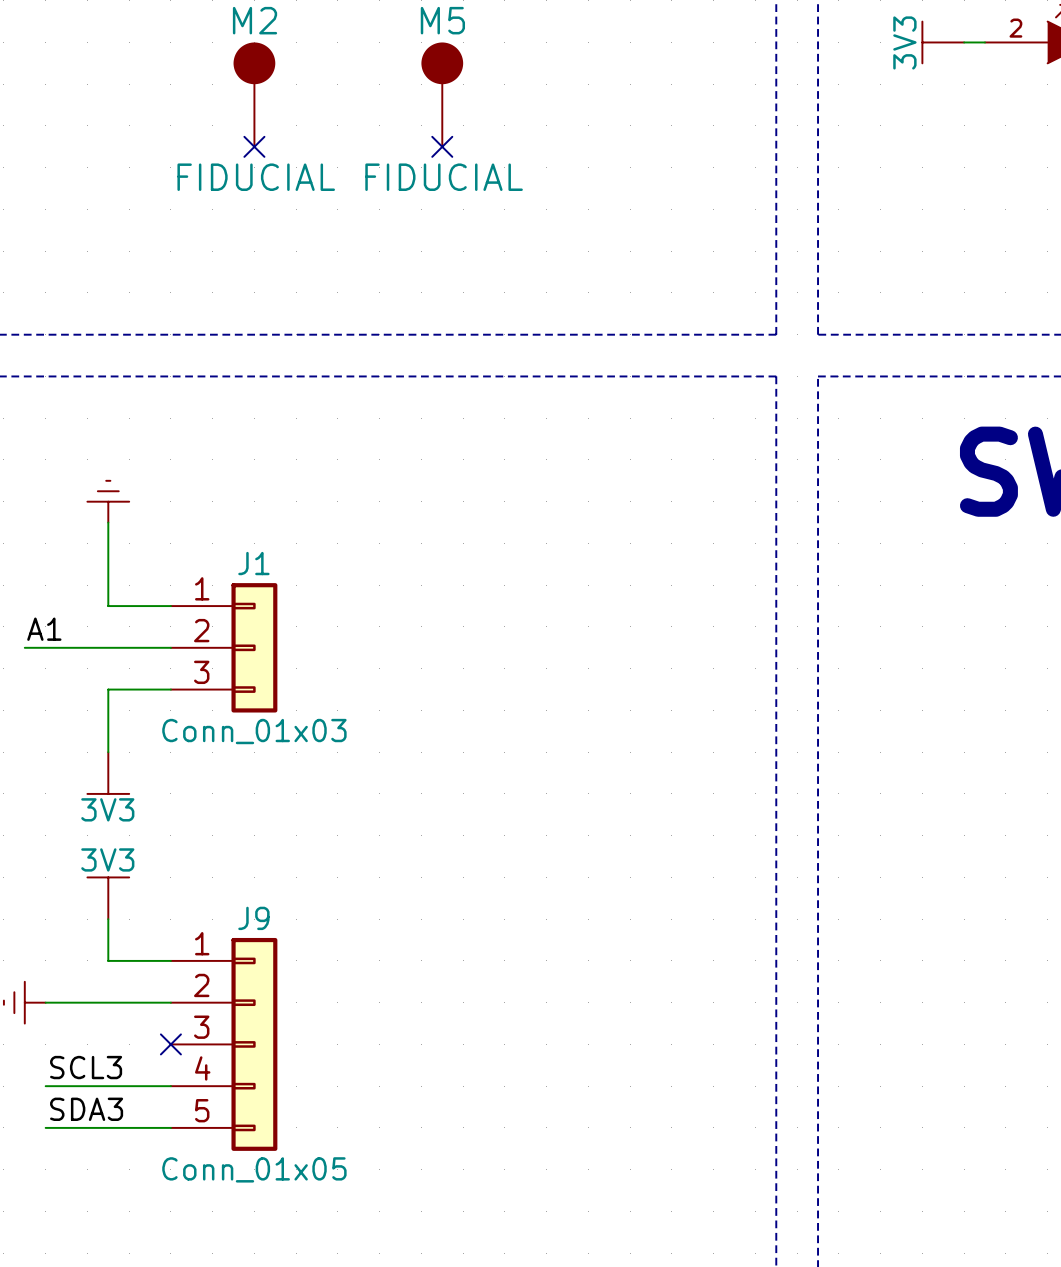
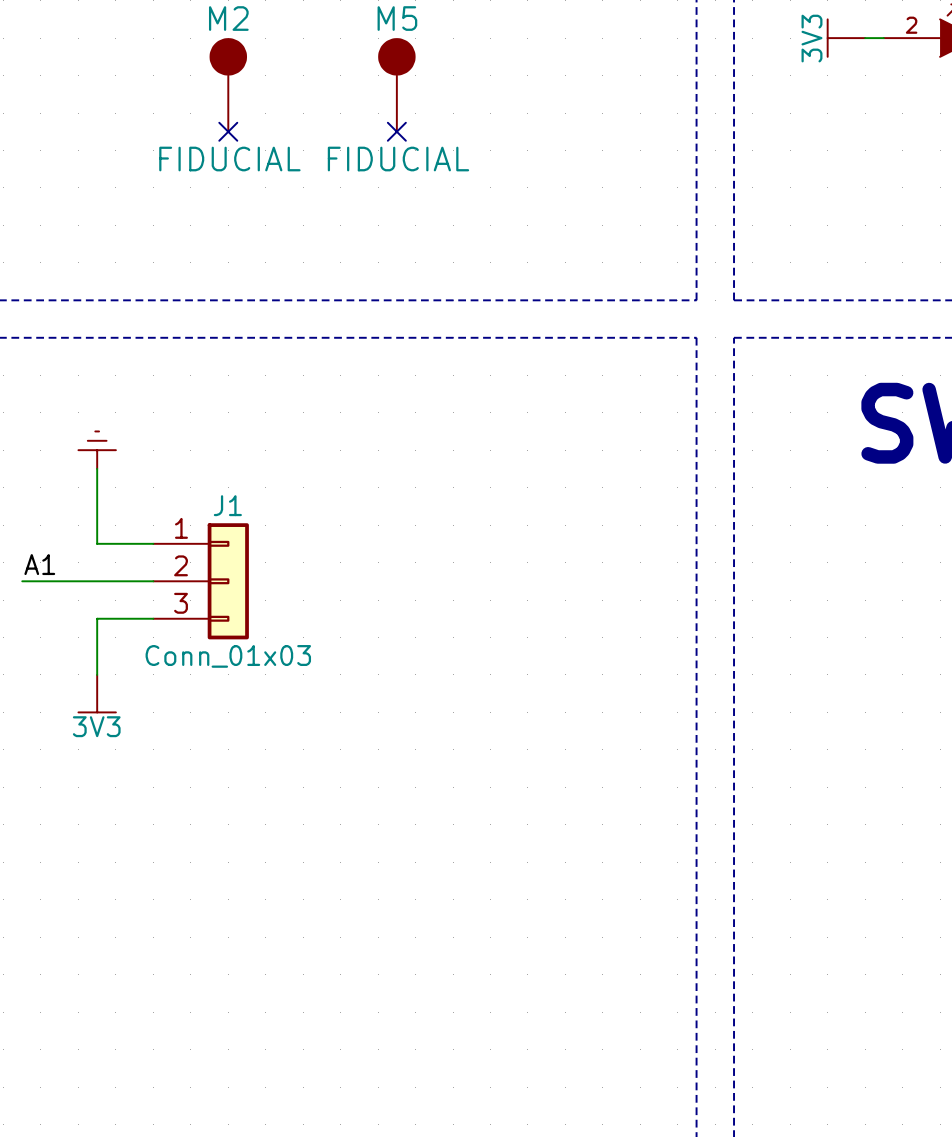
power symbol: 3V3 (108, 898) -> none
wire: (108, 919) (108, 960) (170, 960) -> none
power symbol: (24, 1002) -> none
wire: (45, 1002) (170, 1002) -> none
no-connect mark: (170, 1044) -> none
J9: Conn_01x05 (224, 1044) -> none
label: SCL3 (86, 1067) -> none
wire: (45, 1086) (170, 1086) -> none
label: SDA3 (86, 1109) -> none
wire: (45, 1127) (170, 1127) -> none

